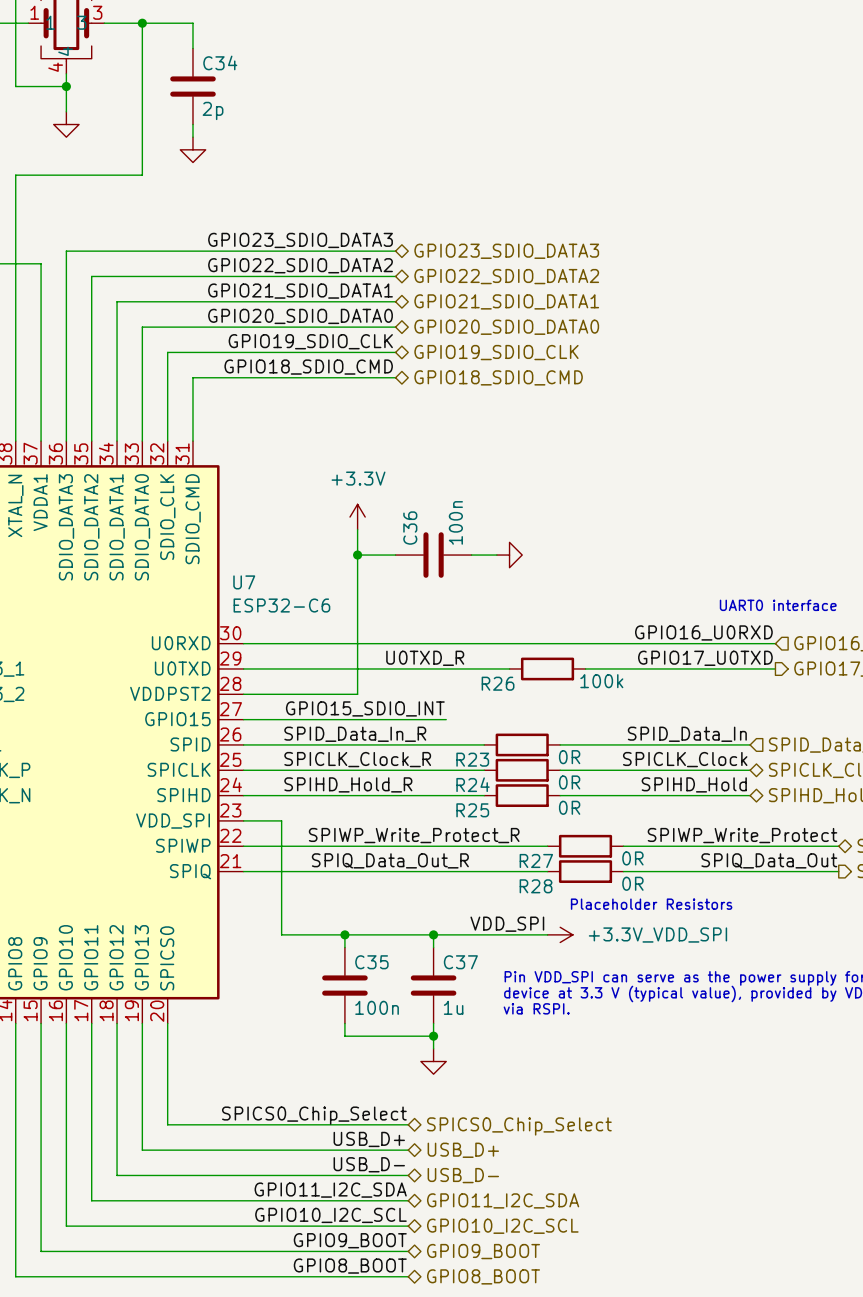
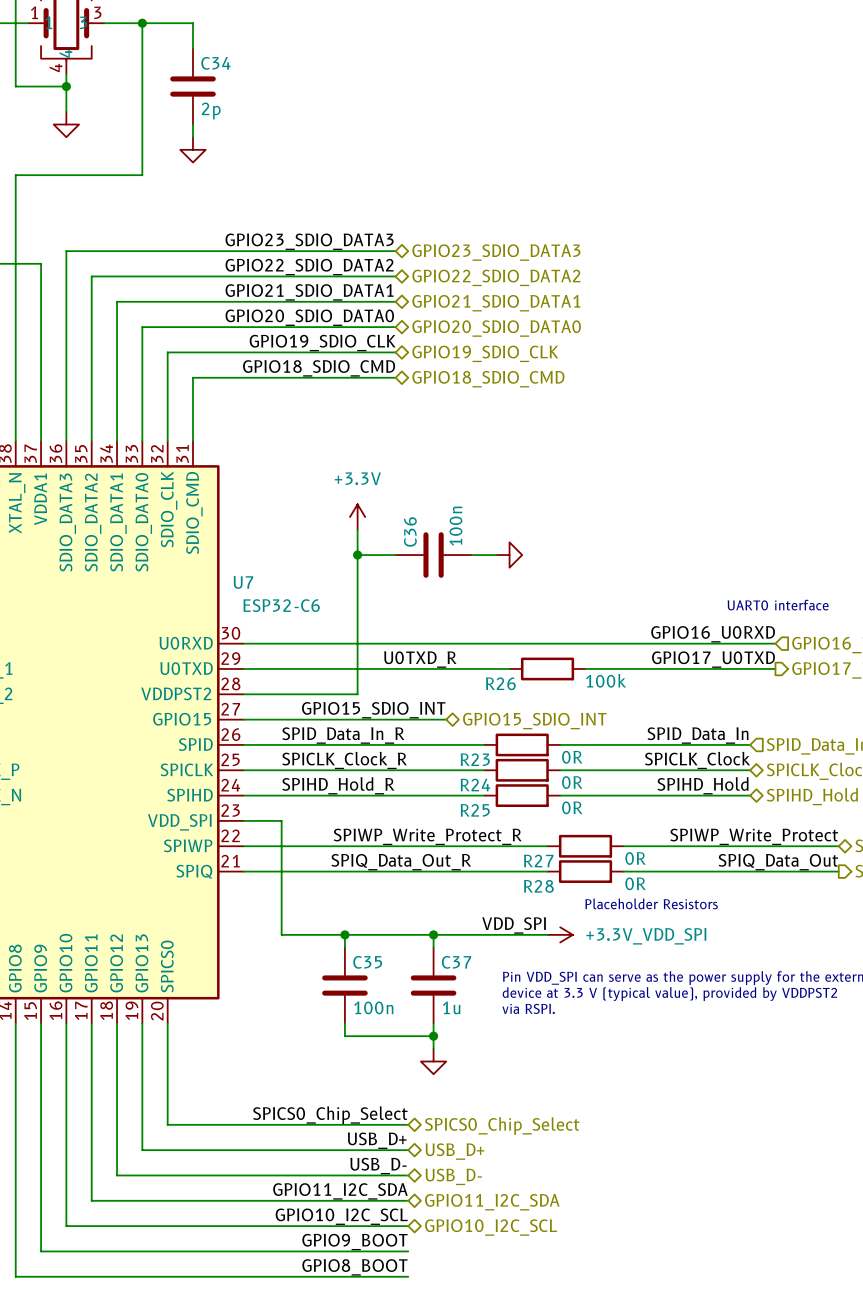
hierarchical label: none -> GPIO15_SDIO_INT (534, 721)
hierarchical label: GPIO9_BOOT (483, 1251) -> none
hierarchical label: GPIO8_BOOT (483, 1276) -> none

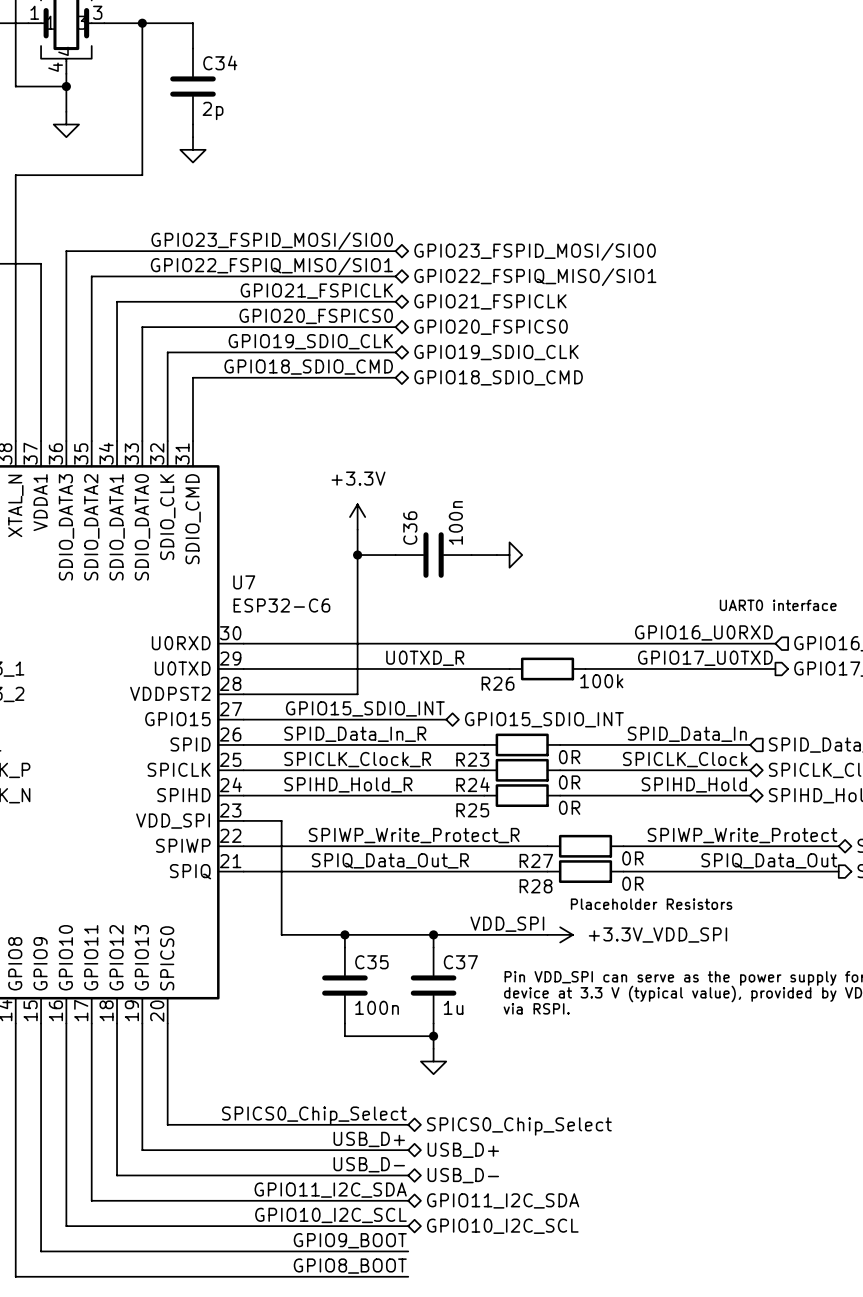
label: GPIO23_SDIO_DATA3 (309, 241) -> GPIO23_FSPID_MOSI/SIO0 (272, 241)
hierarchical label: GPIO23_SDIO_DATA3 (496, 252) -> GPIO23_FSPID_MOSI/SIO0 (535, 251)
label: GPIO22_SDIO_DATA2 (309, 267) -> GPIO22_FSPIQ_MISO/SIO1 (271, 266)
hierarchical label: GPIO22_SDIO_DATA2 (496, 277) -> GPIO22_FSPIQ_MISO/SIO1 (535, 277)
label: GPIO21_SDIO_DATA1 (309, 292) -> GPIO21_FSPICLK (316, 291)
hierarchical label: GPIO21_SDIO_DATA1 (496, 303) -> GPIO21_FSPICLK (490, 301)
label: GPIO20_SDIO_DATA0 (309, 317) -> GPIO20_FSPICS0 (316, 316)
hierarchical label: GPIO20_SDIO_DATA0 (496, 328) -> GPIO20_FSPICS0 (491, 327)

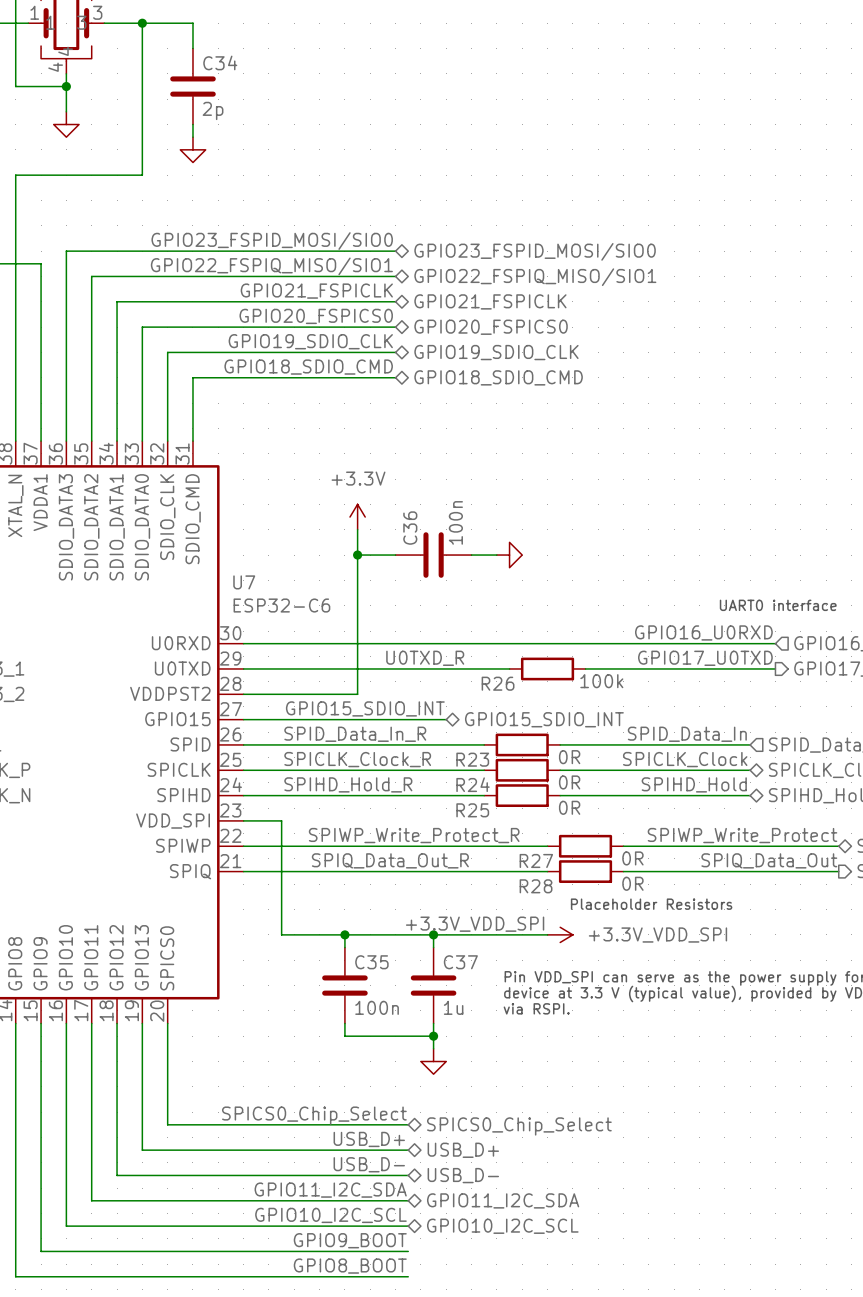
label: VDD_SPI (507, 924) -> +3.3V_VDD_SPI (475, 924)

